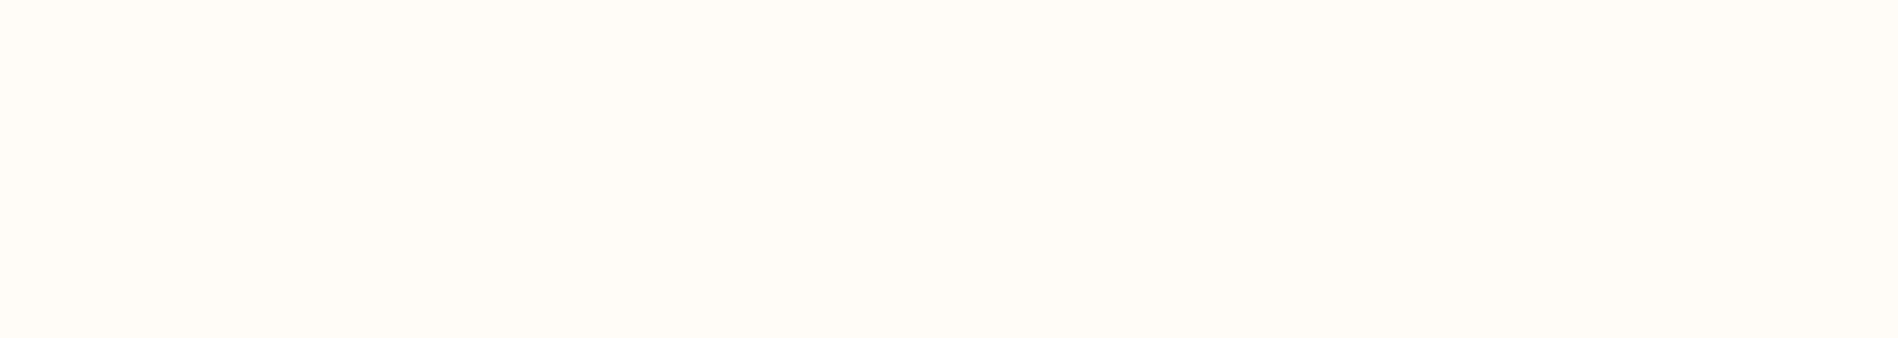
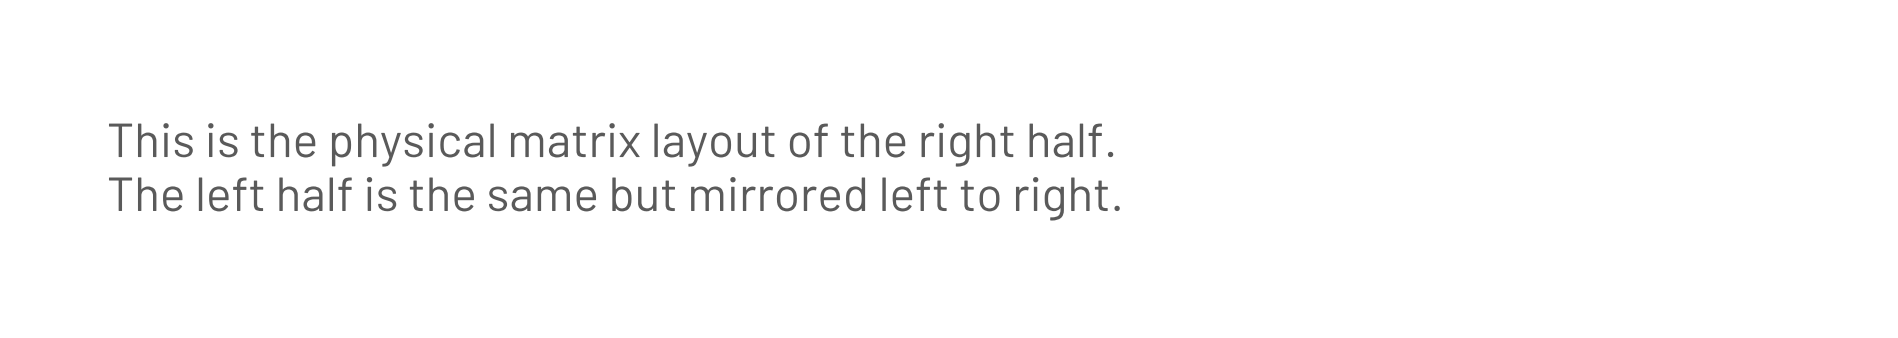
text: none -> This is the physical matrix layout of the right half. (611, 144)
text: none -> The left half is the same but mirrored left to right. (614, 198)

